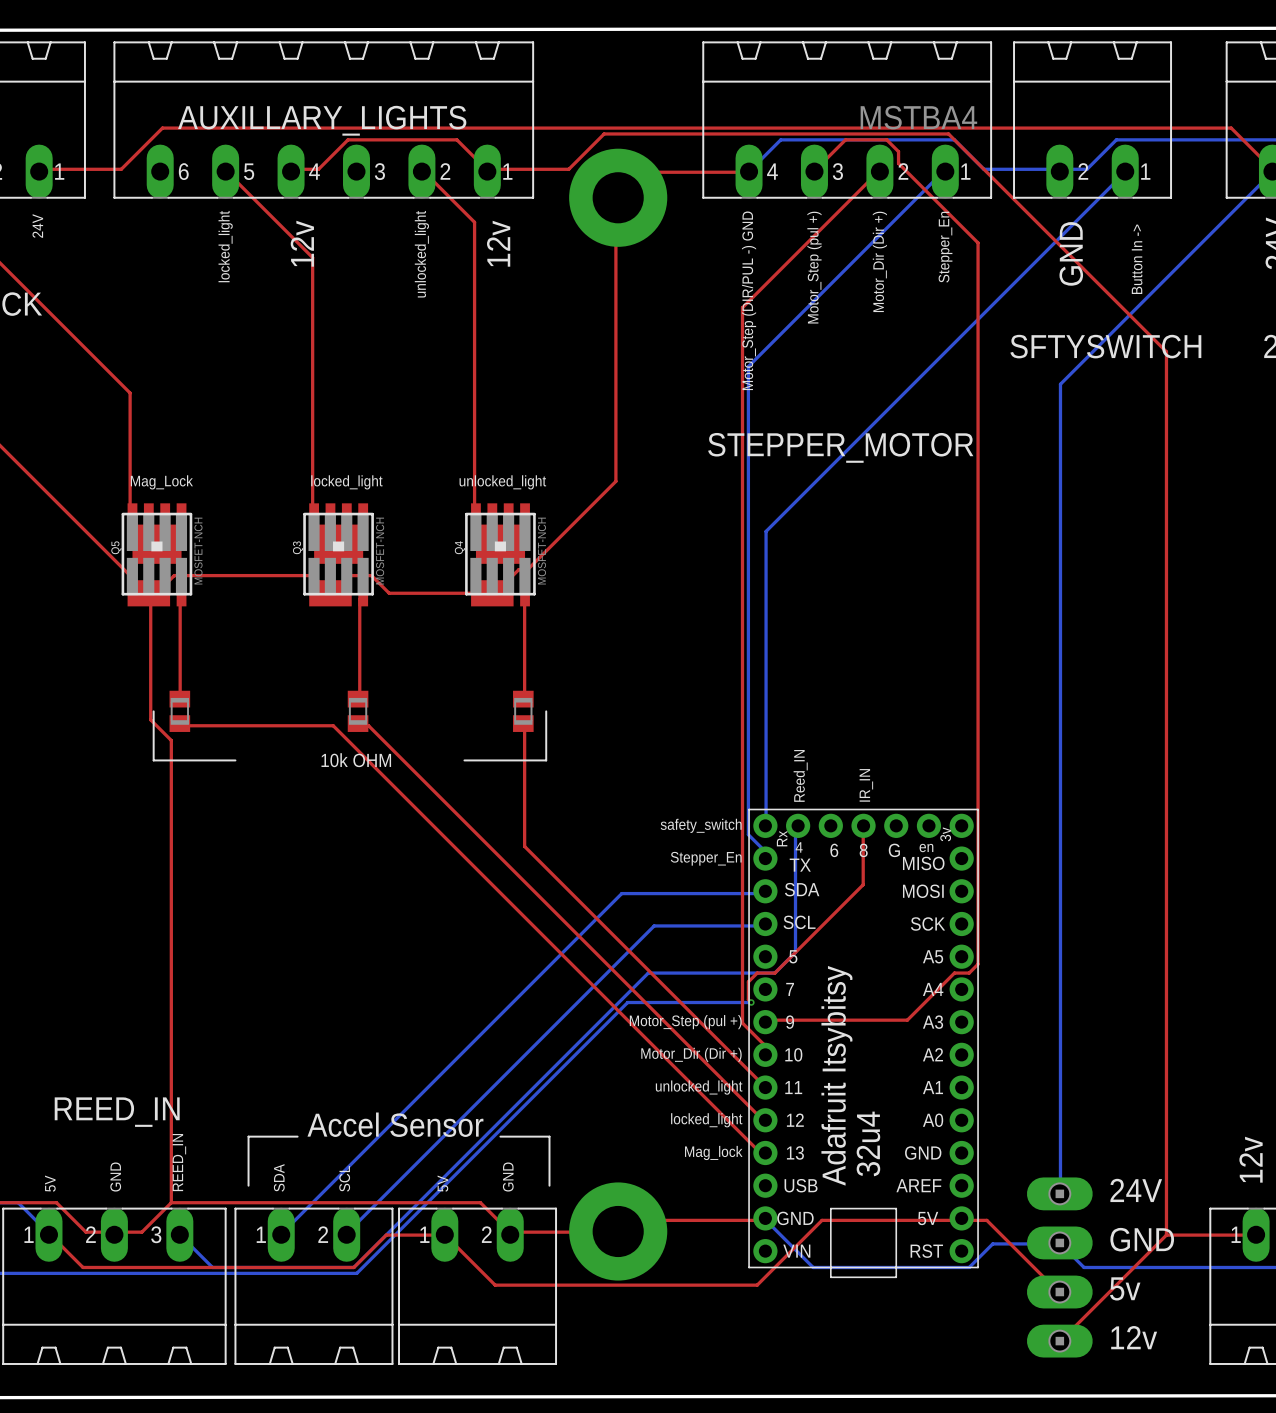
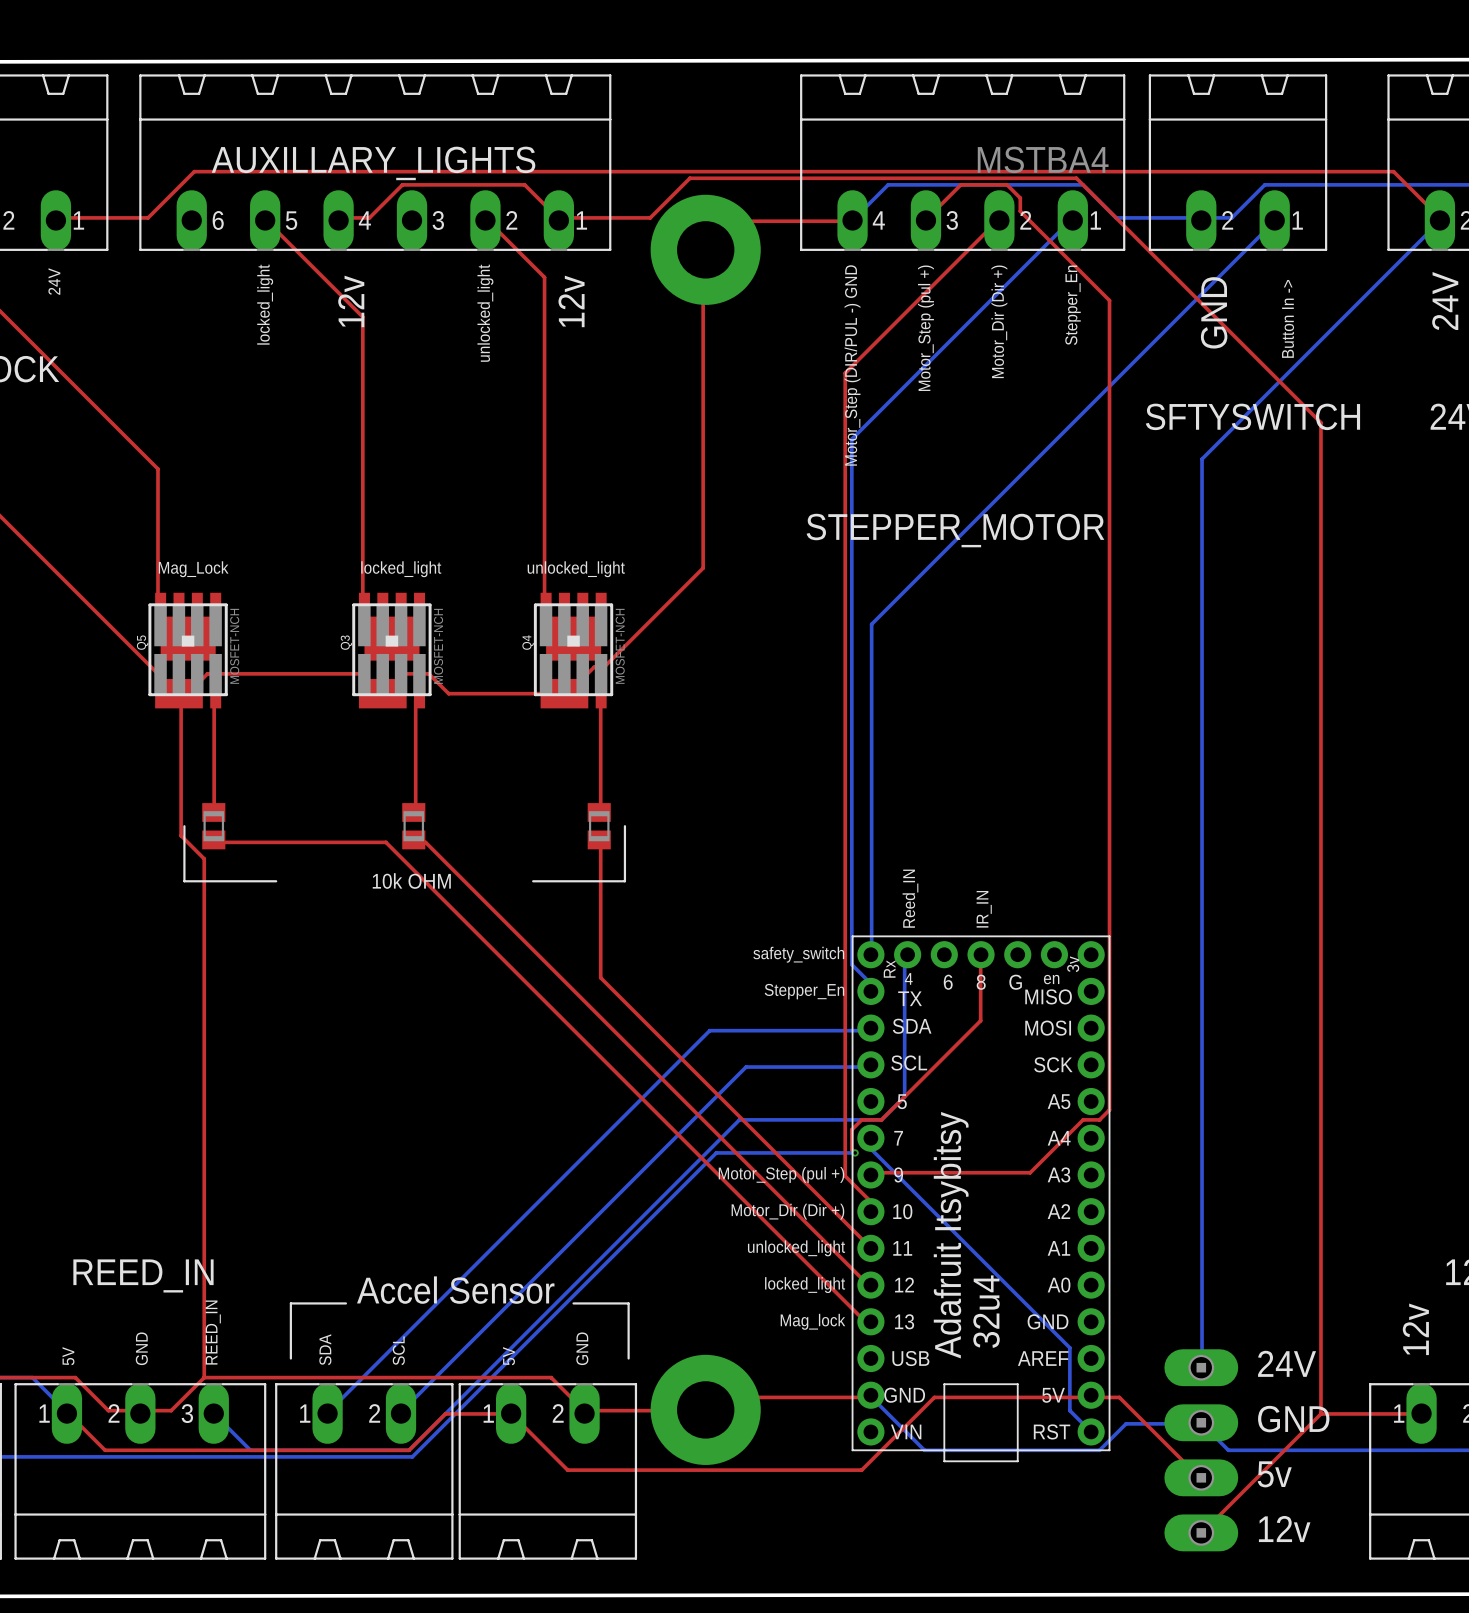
bottom track: none -> (870, 1138) (871, 1149) (1069, 1347) (1069, 1410) (1091, 1431)

